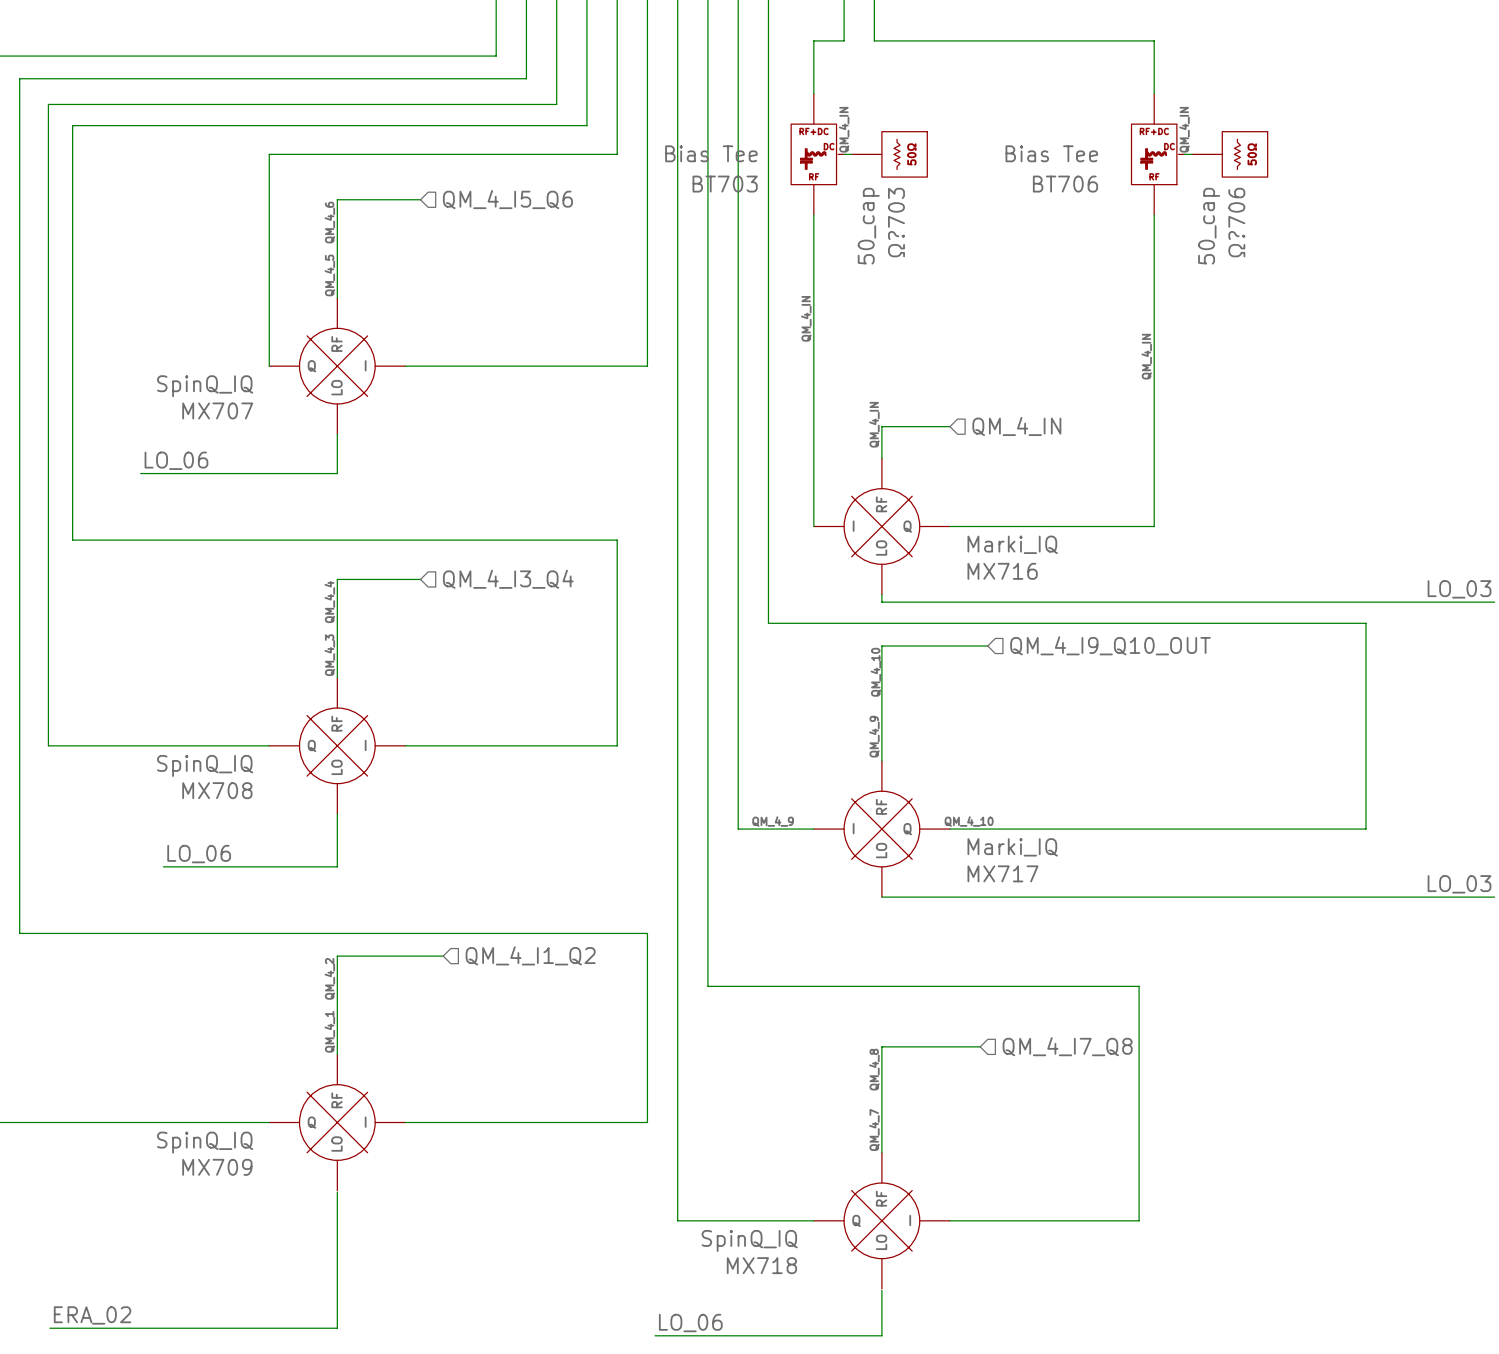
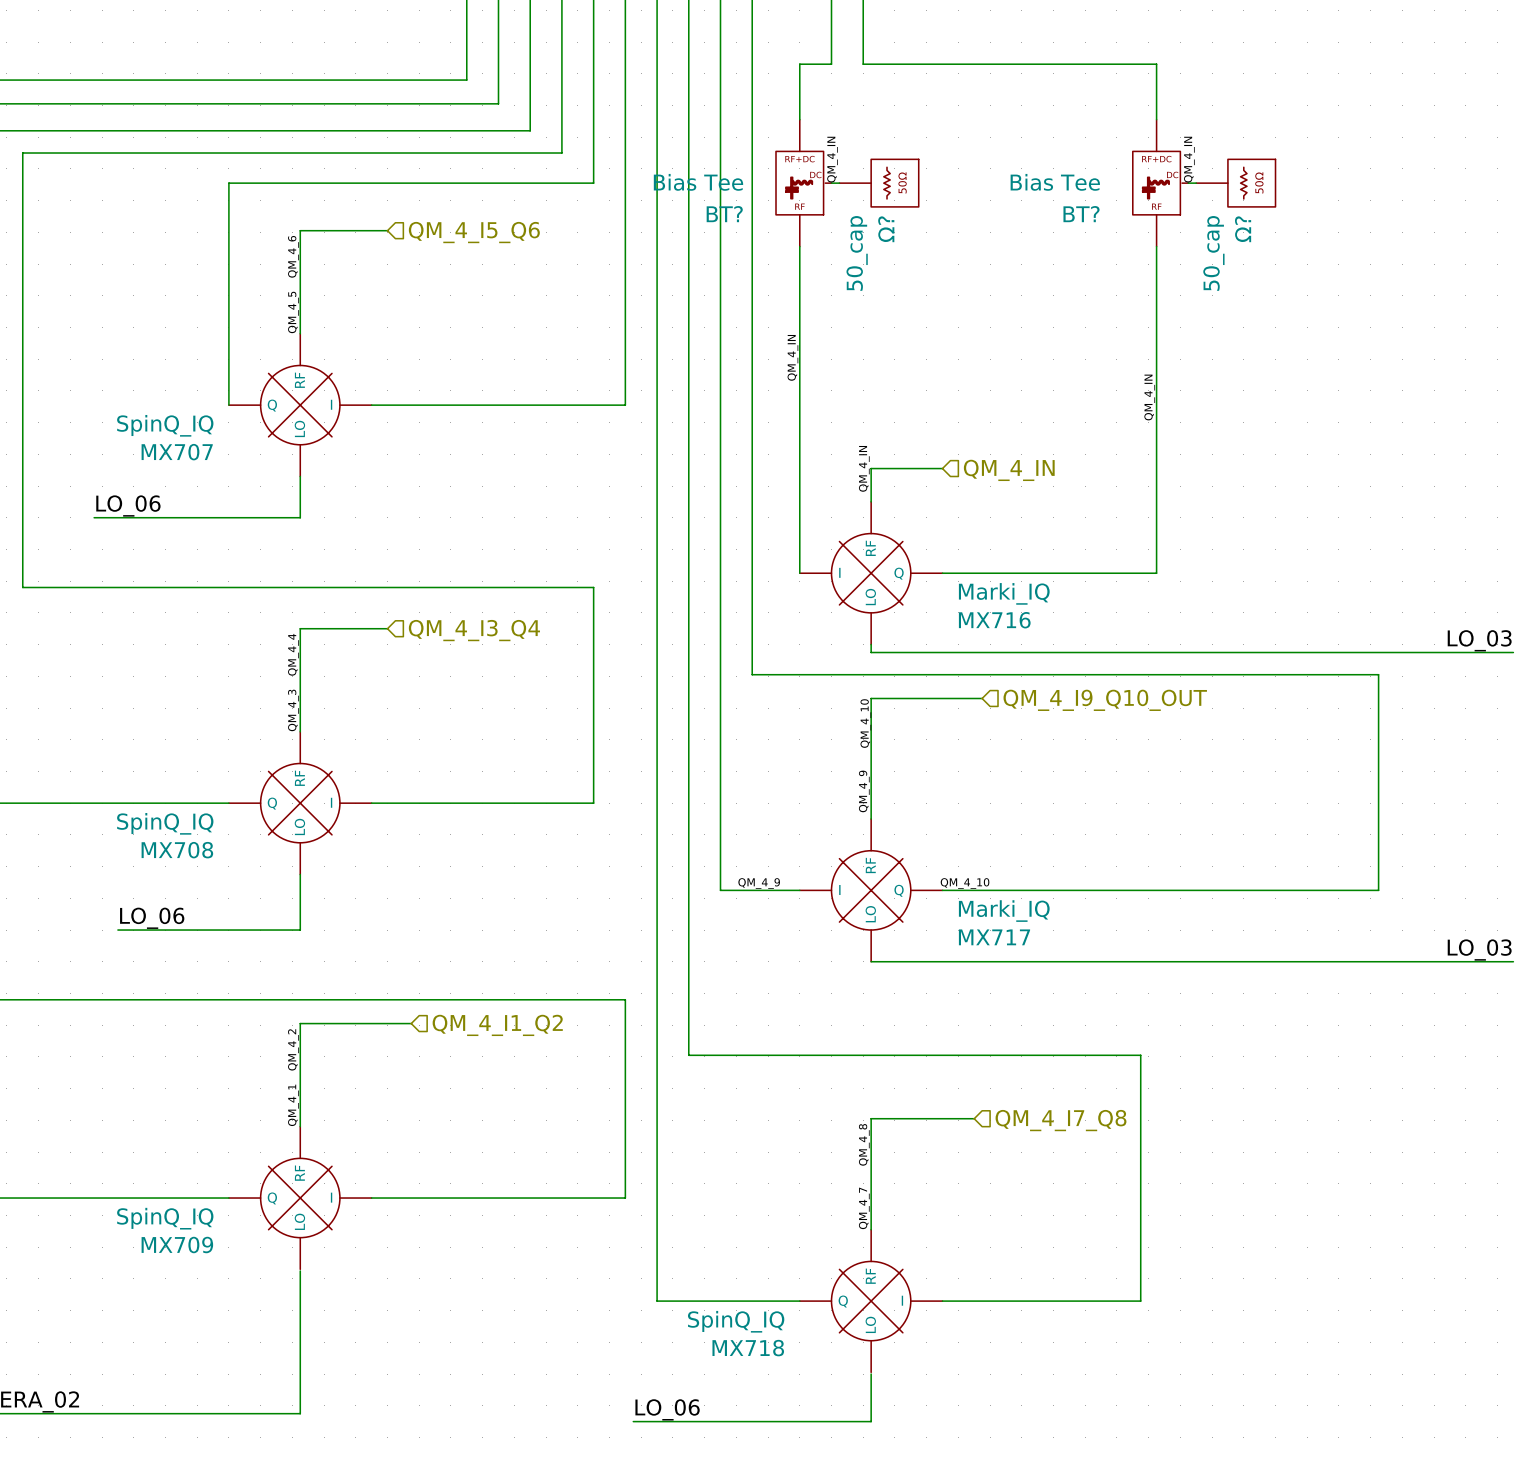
BT703 name: BT703 (725, 184) -> BT? (724, 214)
BT706 name: BT706 (1065, 184) -> BT? (1081, 214)
Ω?703 name: Ω?703 (896, 222) -> Ω? (886, 229)
Ω?706 name: Ω?706 (1236, 222) -> Ω? (1243, 229)

